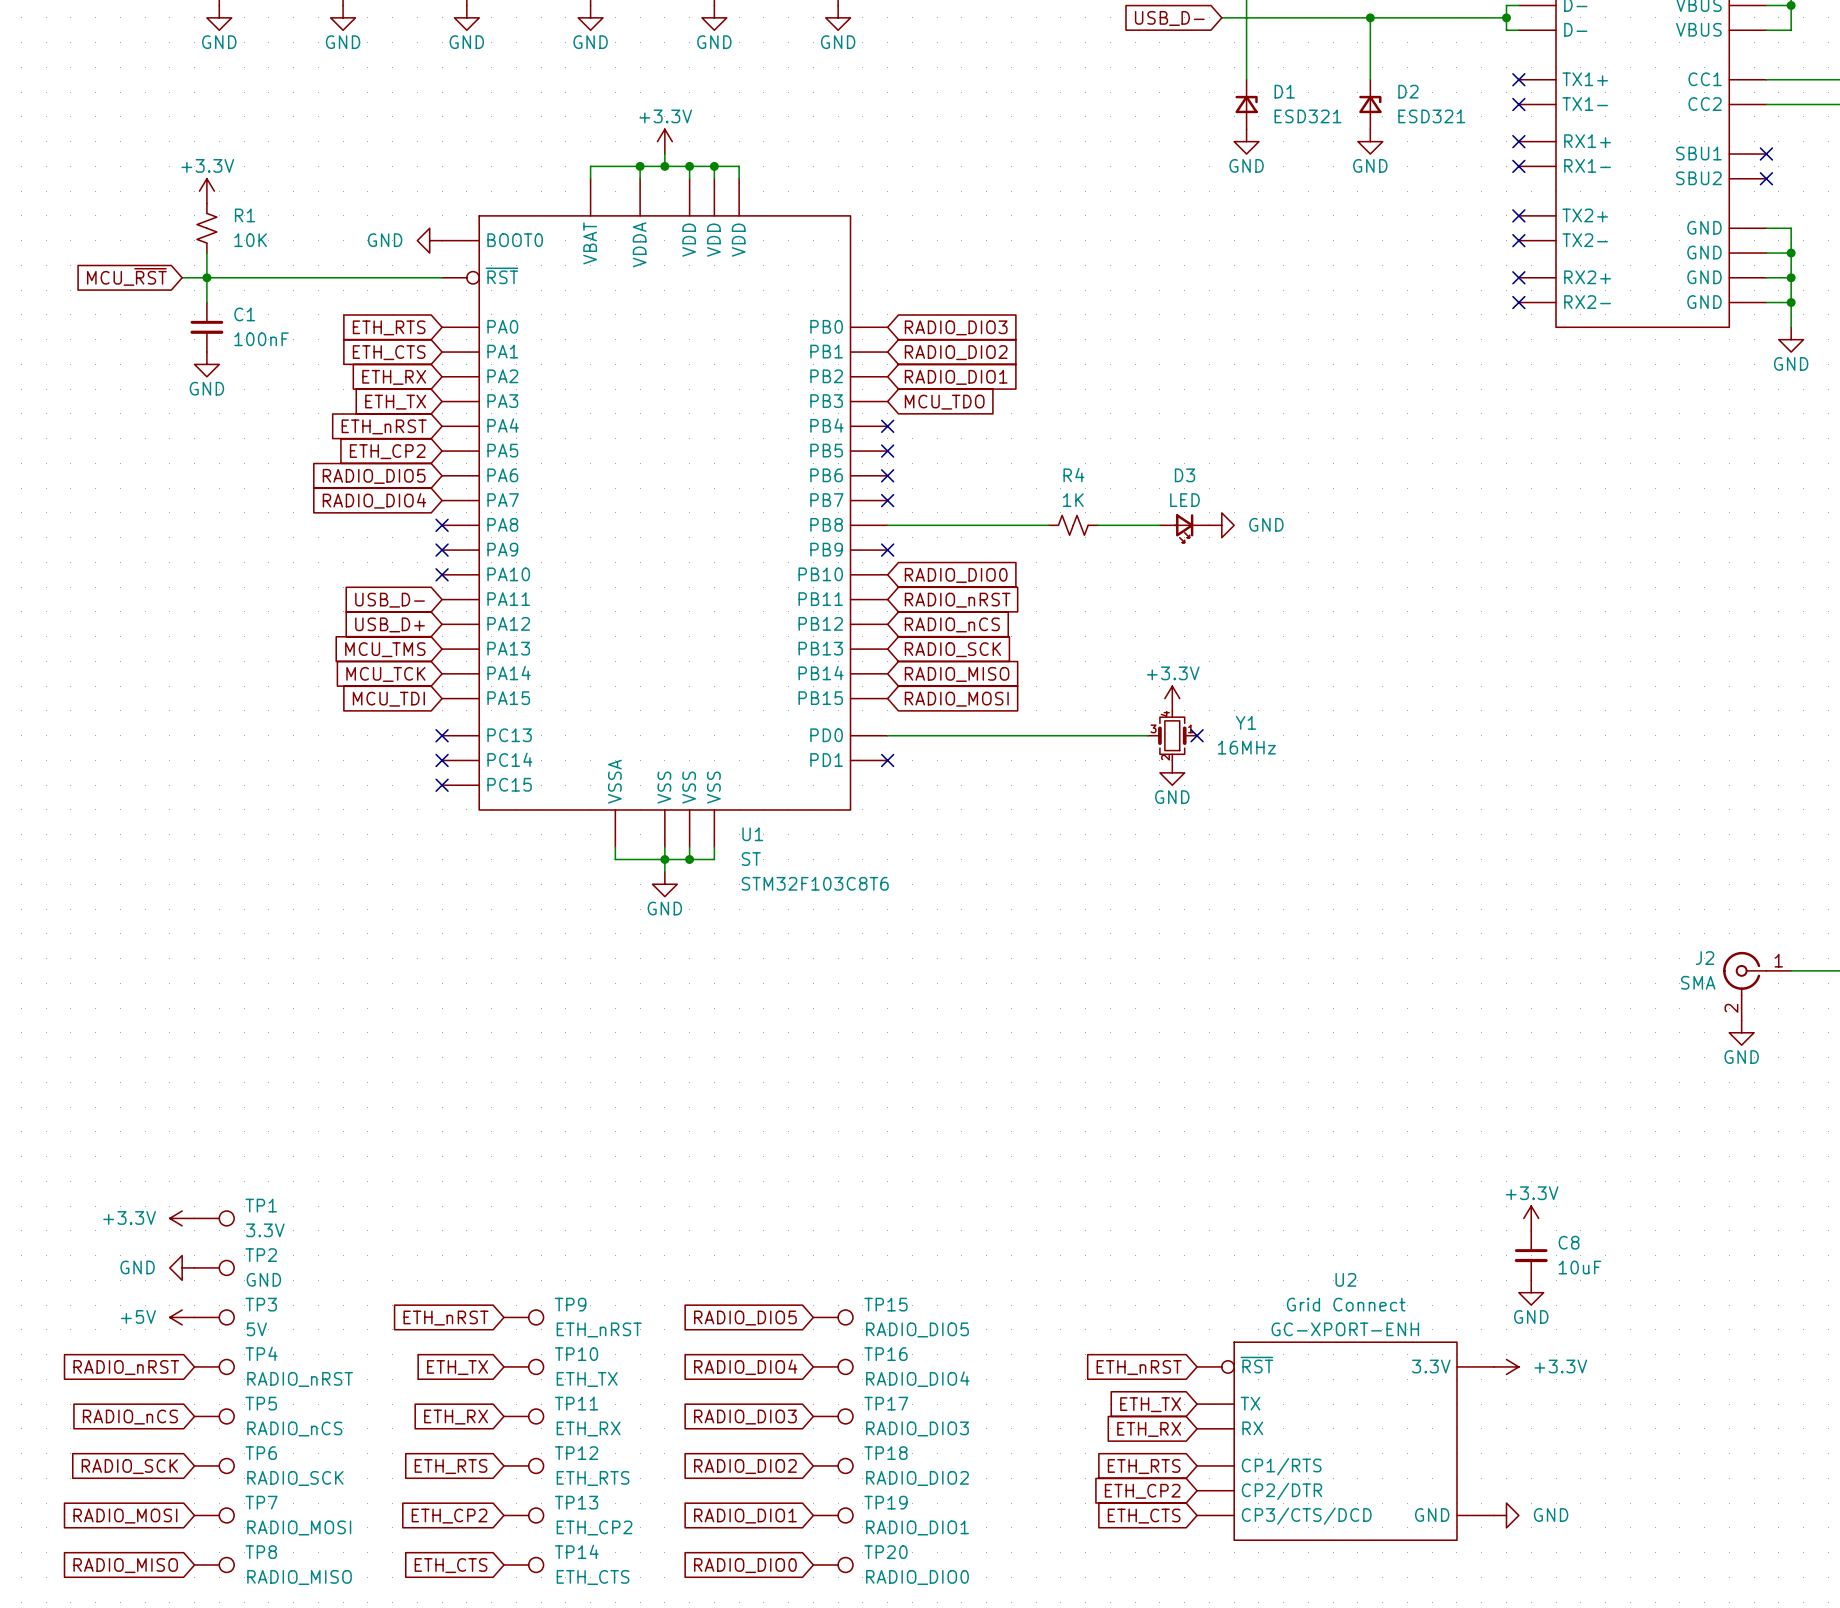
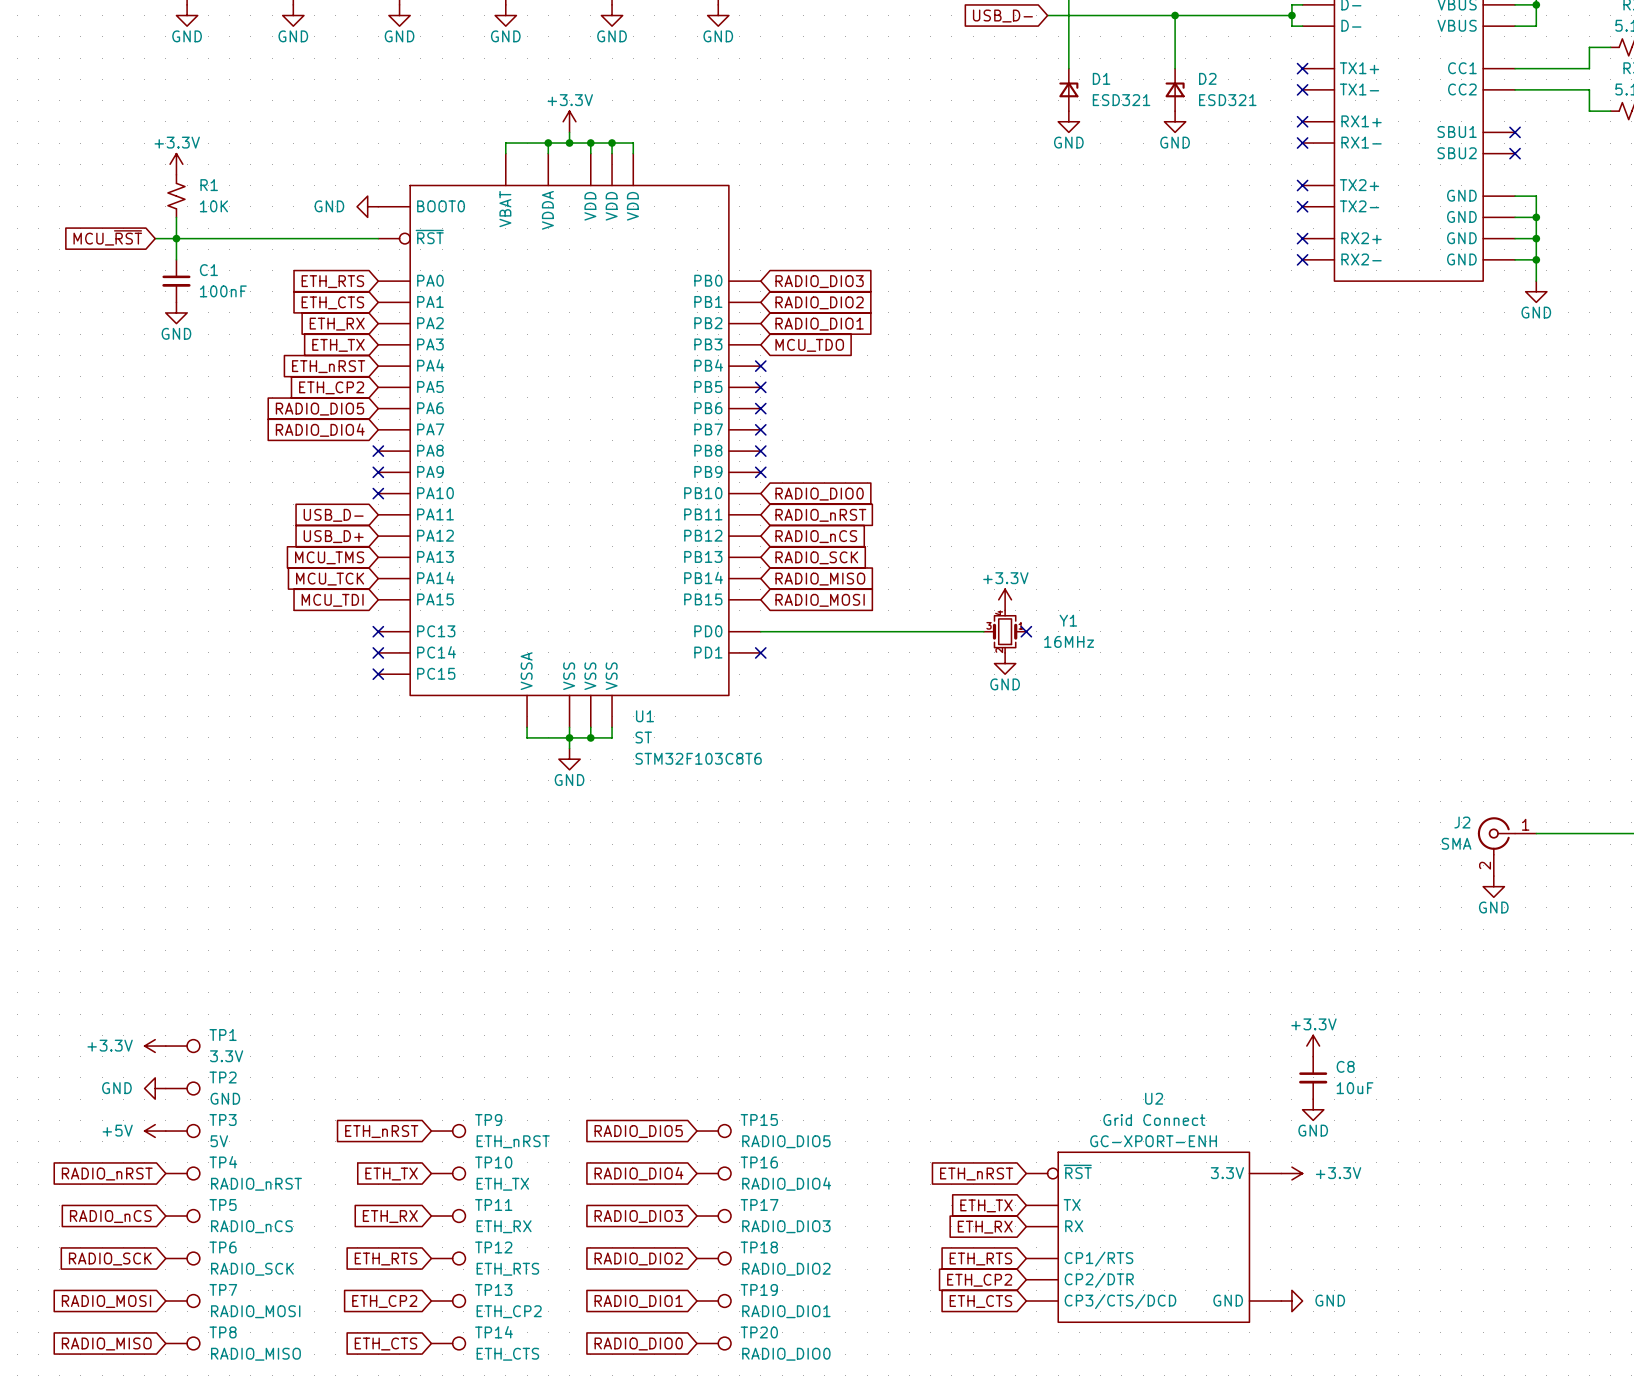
wire: (887, 525) (1048, 525) -> none
no-connect mark: none -> (760, 451)
R4: 1K (1073, 525) -> none
wire: (1098, 525) (1159, 525) -> none
power symbol: GND (1221, 525) -> none
D3: LED (1184, 528) -> none

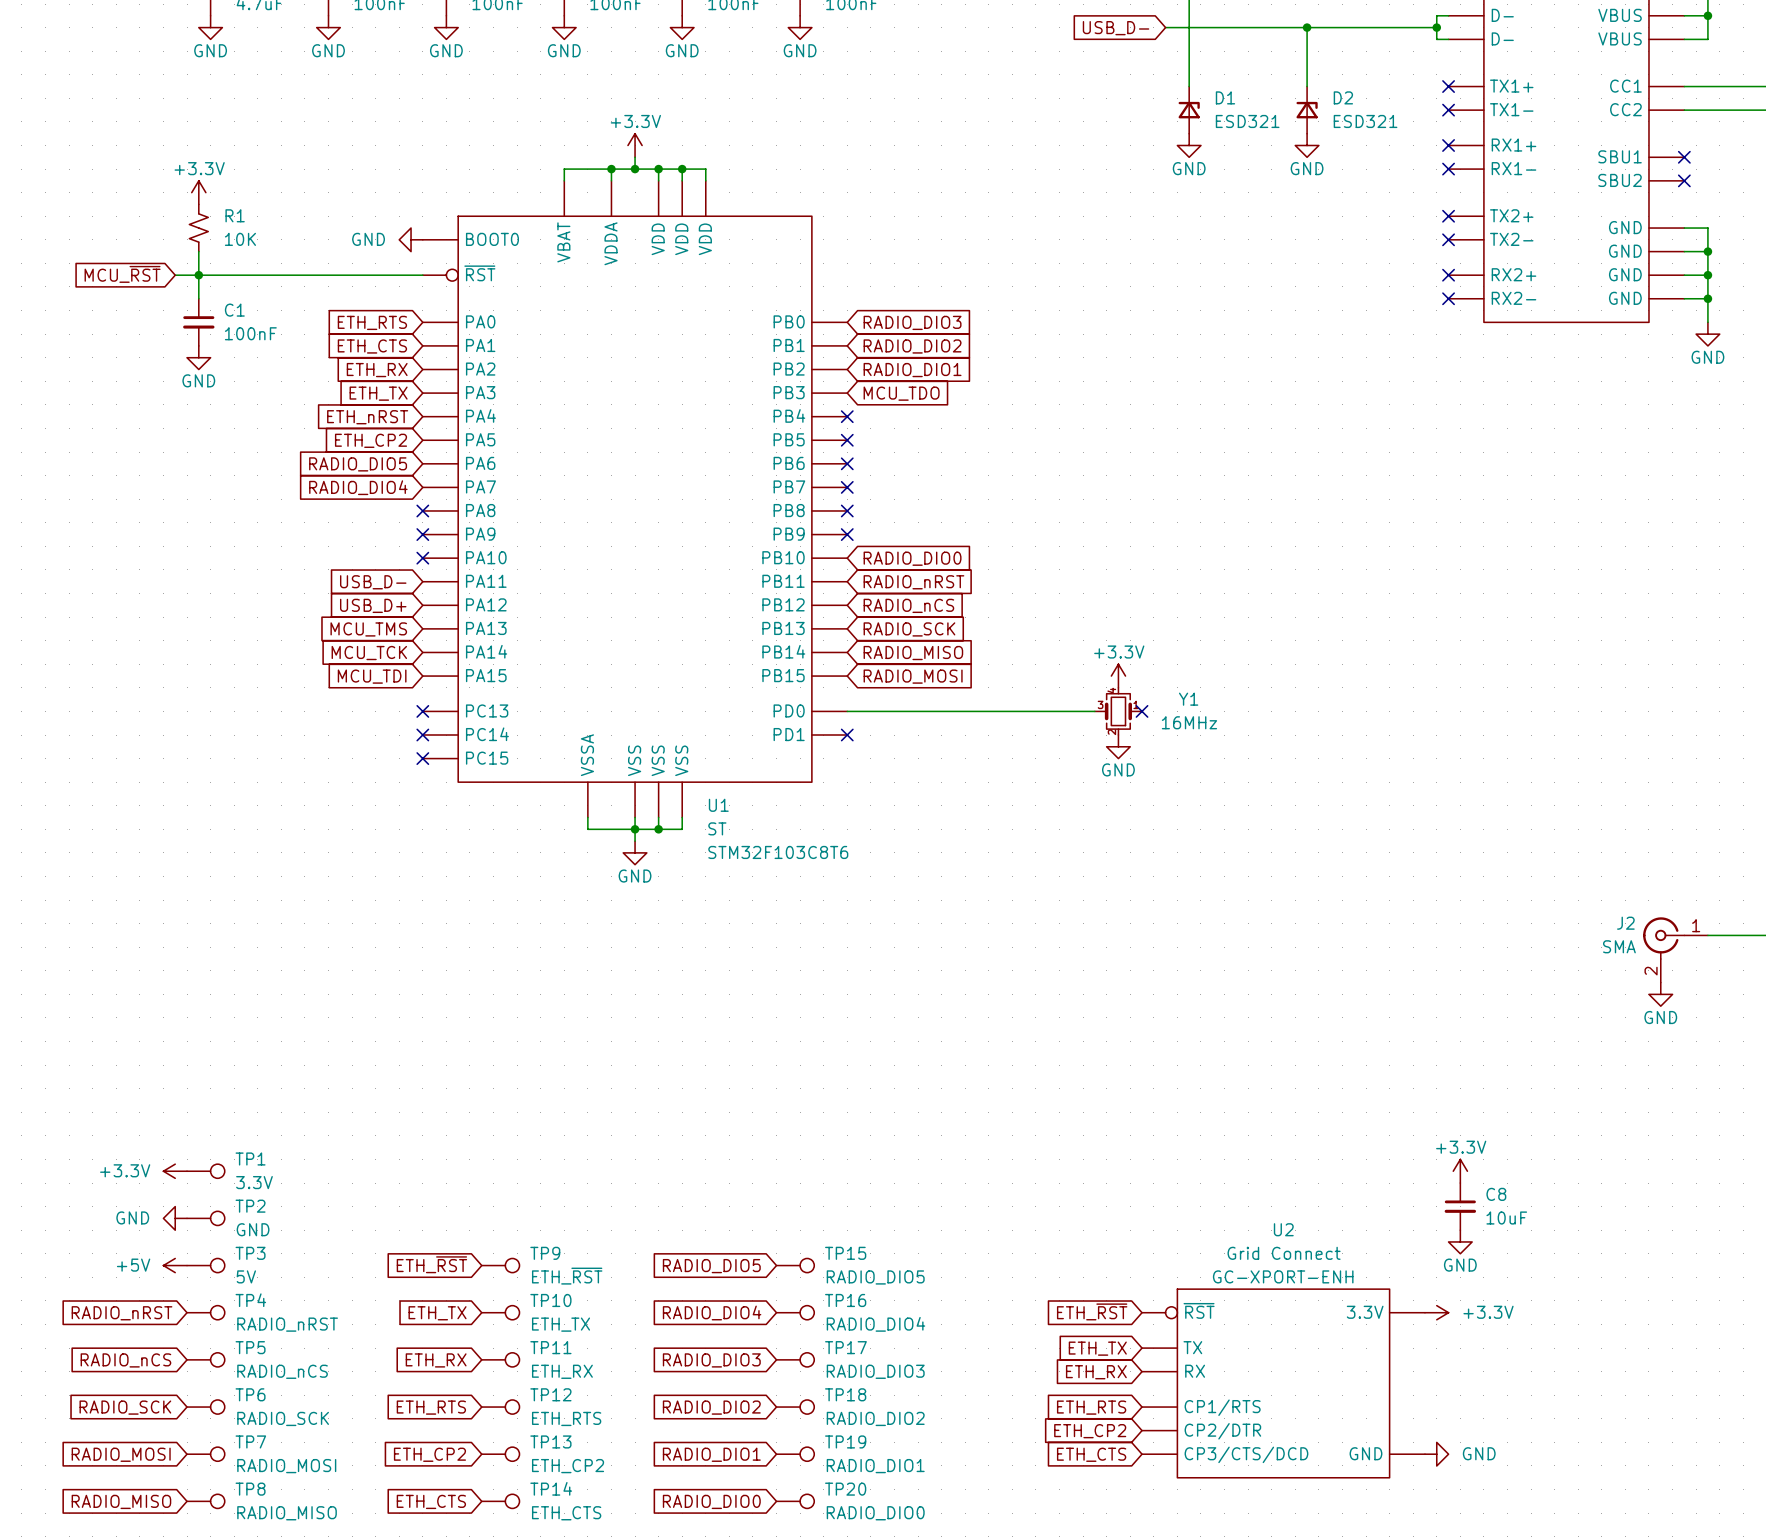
global label: ETH_nRST (381, 1131) -> ETH_~{RST} (431, 1264)
TP9 value: ETH_nRST (513, 1141) -> ETH_~{RST} (567, 1276)
global label: ETH_nRST (976, 1174) -> ETH_~{RST} (1092, 1311)

